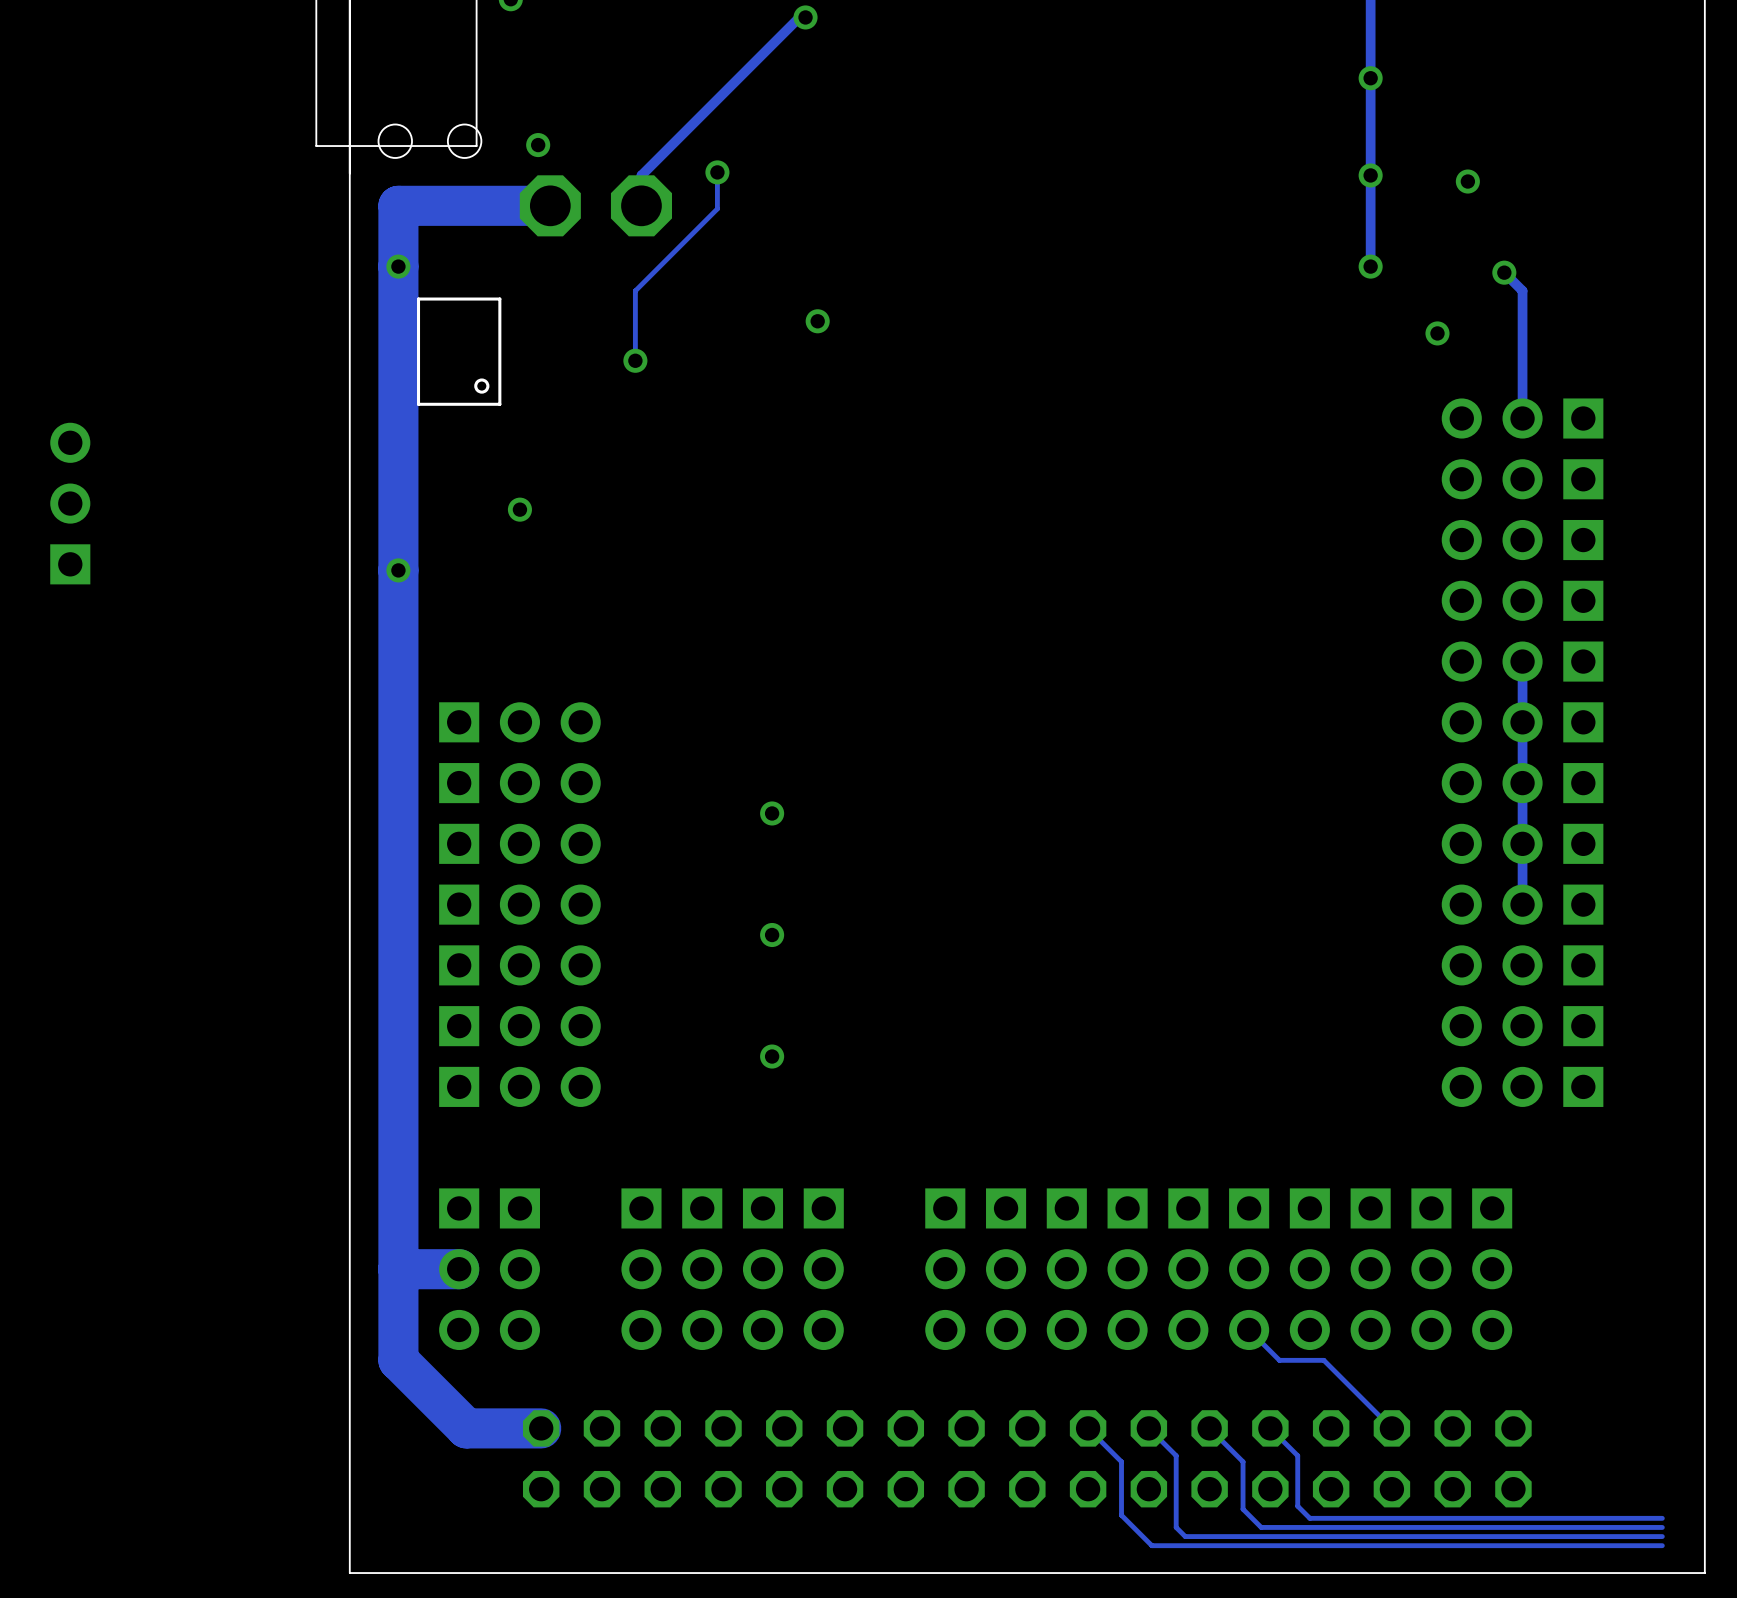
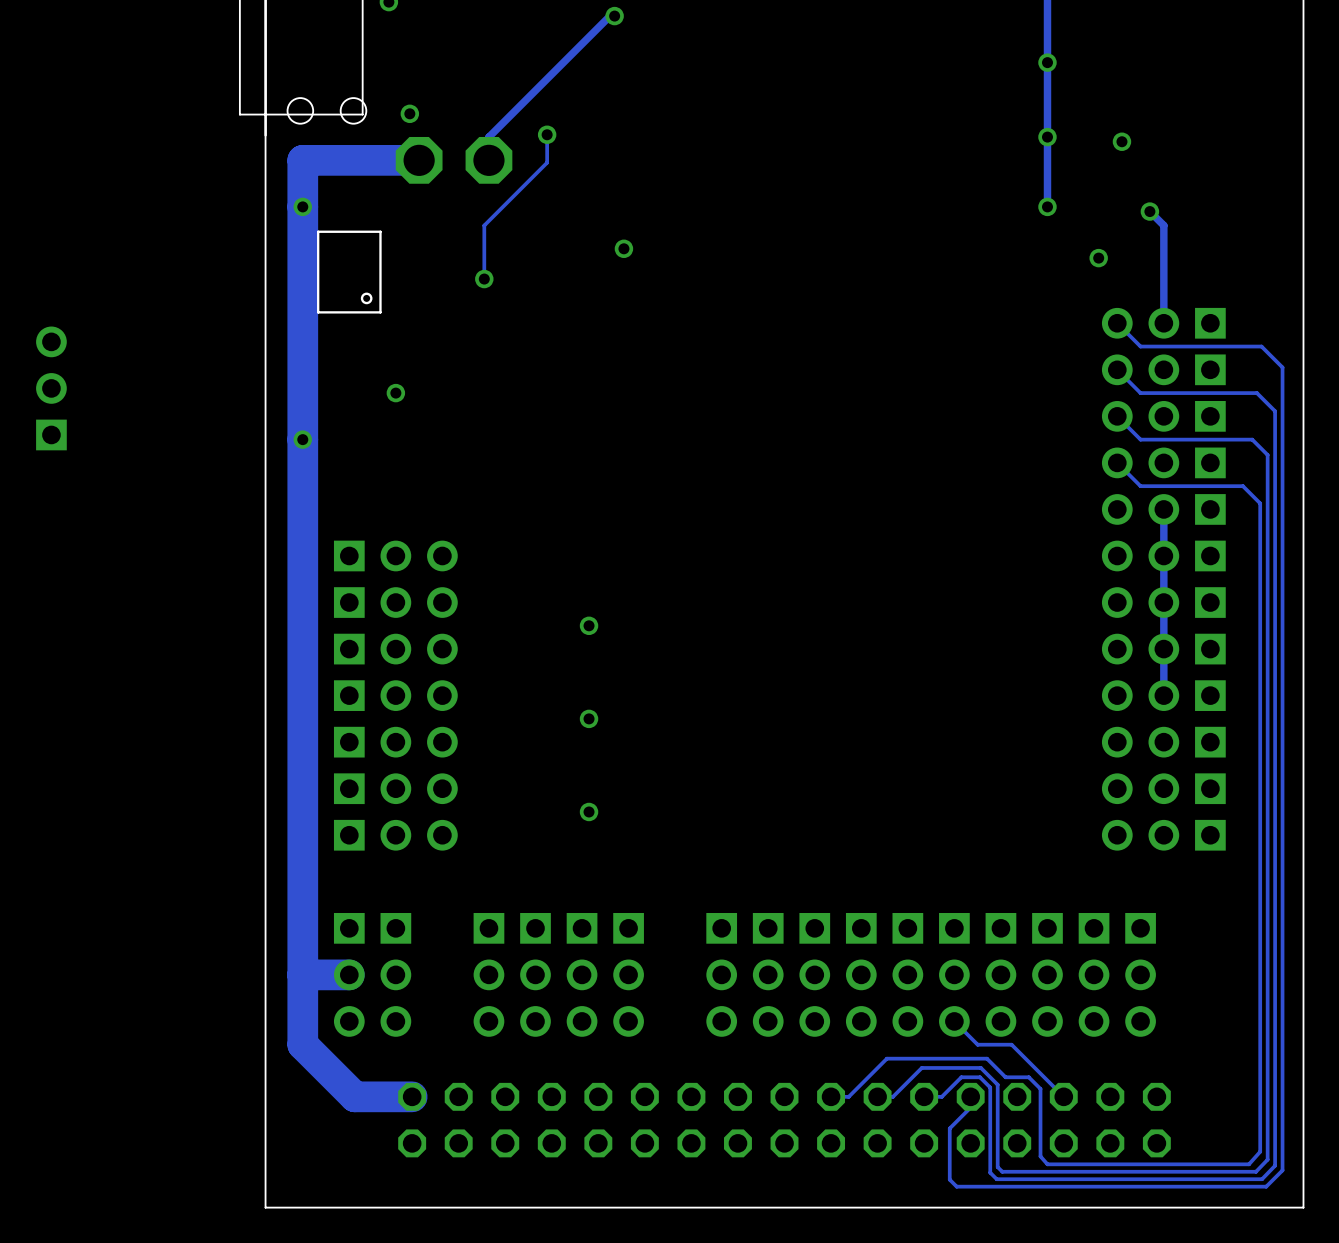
track: none -> (1117, 369) (1140, 393) (1256, 393) (1275, 411) (1275, 1165) (1262, 1179) (996, 1179) (990, 1172) (990, 1087) (980, 1077) (961, 1077) (941, 1096) (924, 1096)
track: none -> (1117, 462) (1140, 486) (1242, 486) (1260, 503) (1260, 1151) (1249, 1164) (1047, 1164) (1040, 1156) (1040, 1088) (1028, 1077) (1005, 1077) (986, 1058) (886, 1058) (848, 1096) (831, 1096)
track: (1088, 1428) (1121, 1461) (1121, 1515) (1151, 1545) (1252, 1545) -> (949, 1158) (949, 1179) (956, 1186)
track: (1148, 1428) (1176, 1455) (1176, 1527) (1185, 1536) (1662, 1536) -> (877, 1096) (892, 1096) (921, 1067) (980, 1067) (997, 1084) (997, 1167) (1002, 1171) (1256, 1171) (1267, 1159) (1267, 454) (1252, 439) (1140, 439) (1117, 416)
track: (1209, 1428) (1243, 1461) (1243, 1469) -> (970, 1096) (970, 1107) (949, 1128)
track: (1270, 1428) (1297, 1455) (1297, 1506) (1309, 1518) (1662, 1518) -> none
track: (1243, 1509) (1261, 1527) (1662, 1527) -> none
track: (1662, 1545) (1656, 1545) -> (1117, 323) (1140, 346) (1261, 346) (1282, 367) (1282, 1170) (1266, 1186)

